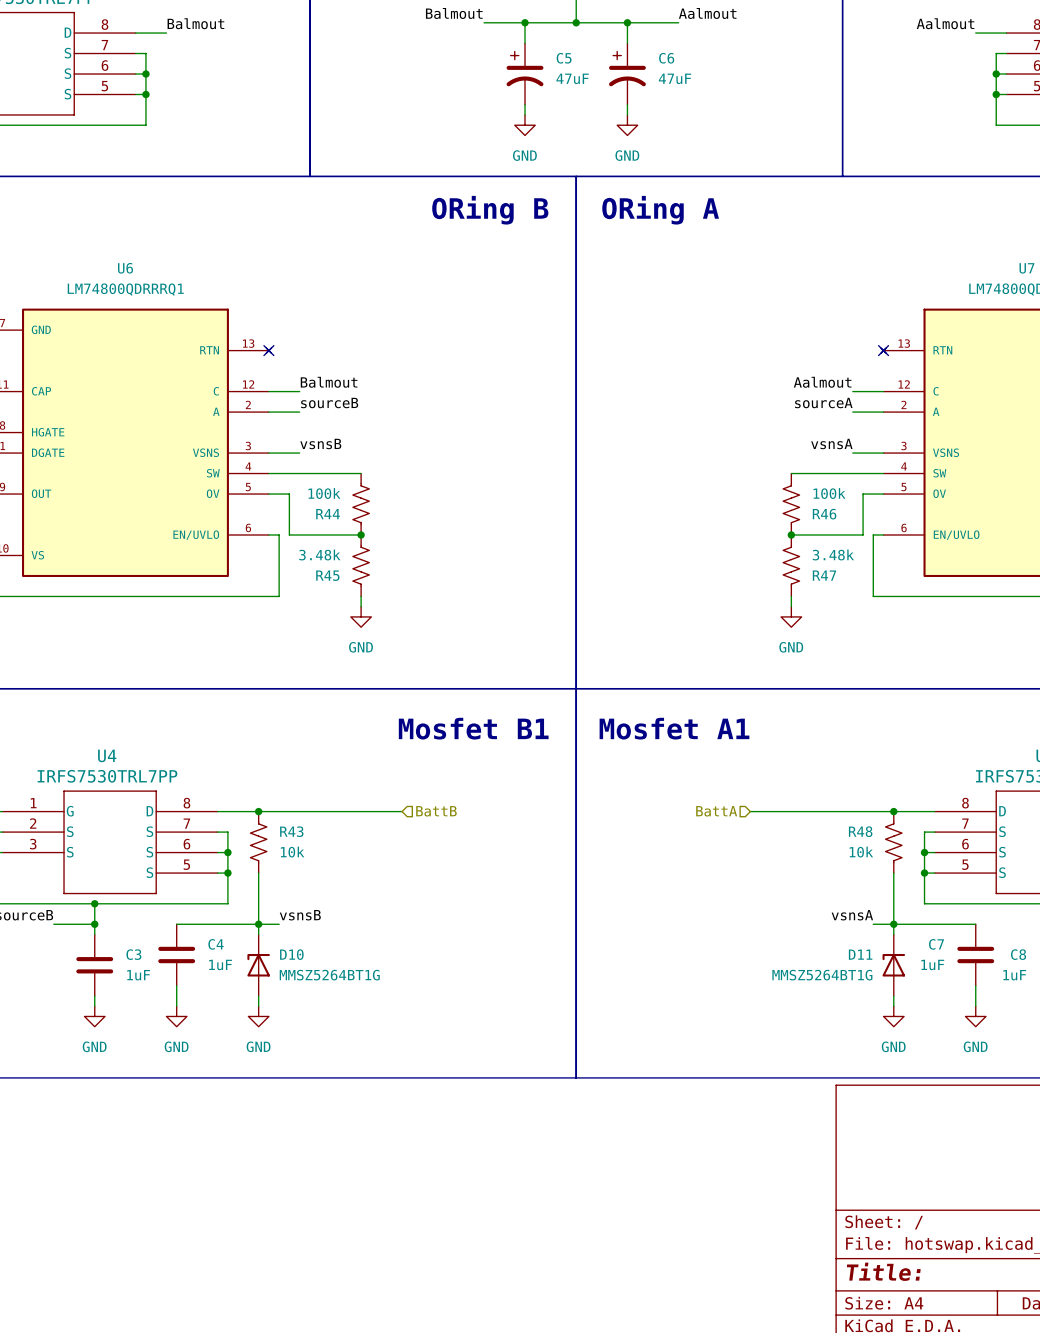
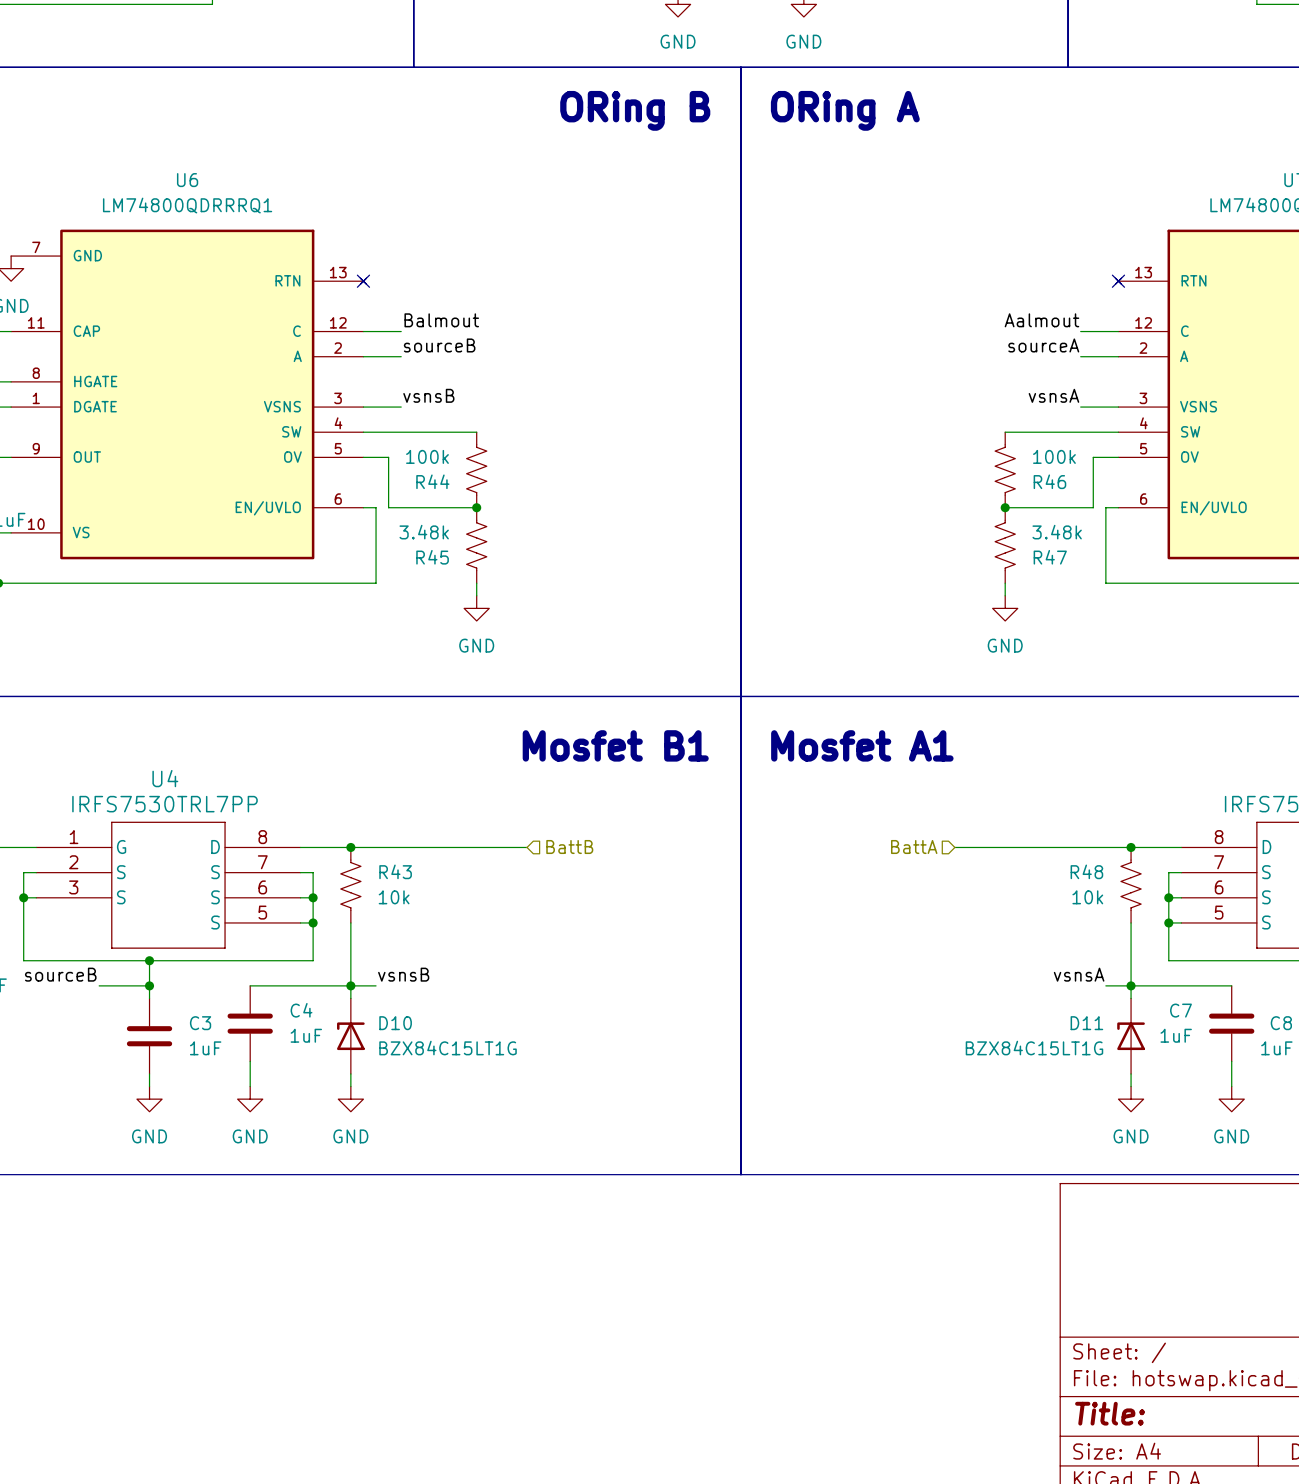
D10 value: MMSZ5264BT1G (329, 975) -> BZX84C15LT1G (448, 1048)
D11 value: MMSZ5264BT1G (822, 975) -> BZX84C15LT1G (1034, 1048)

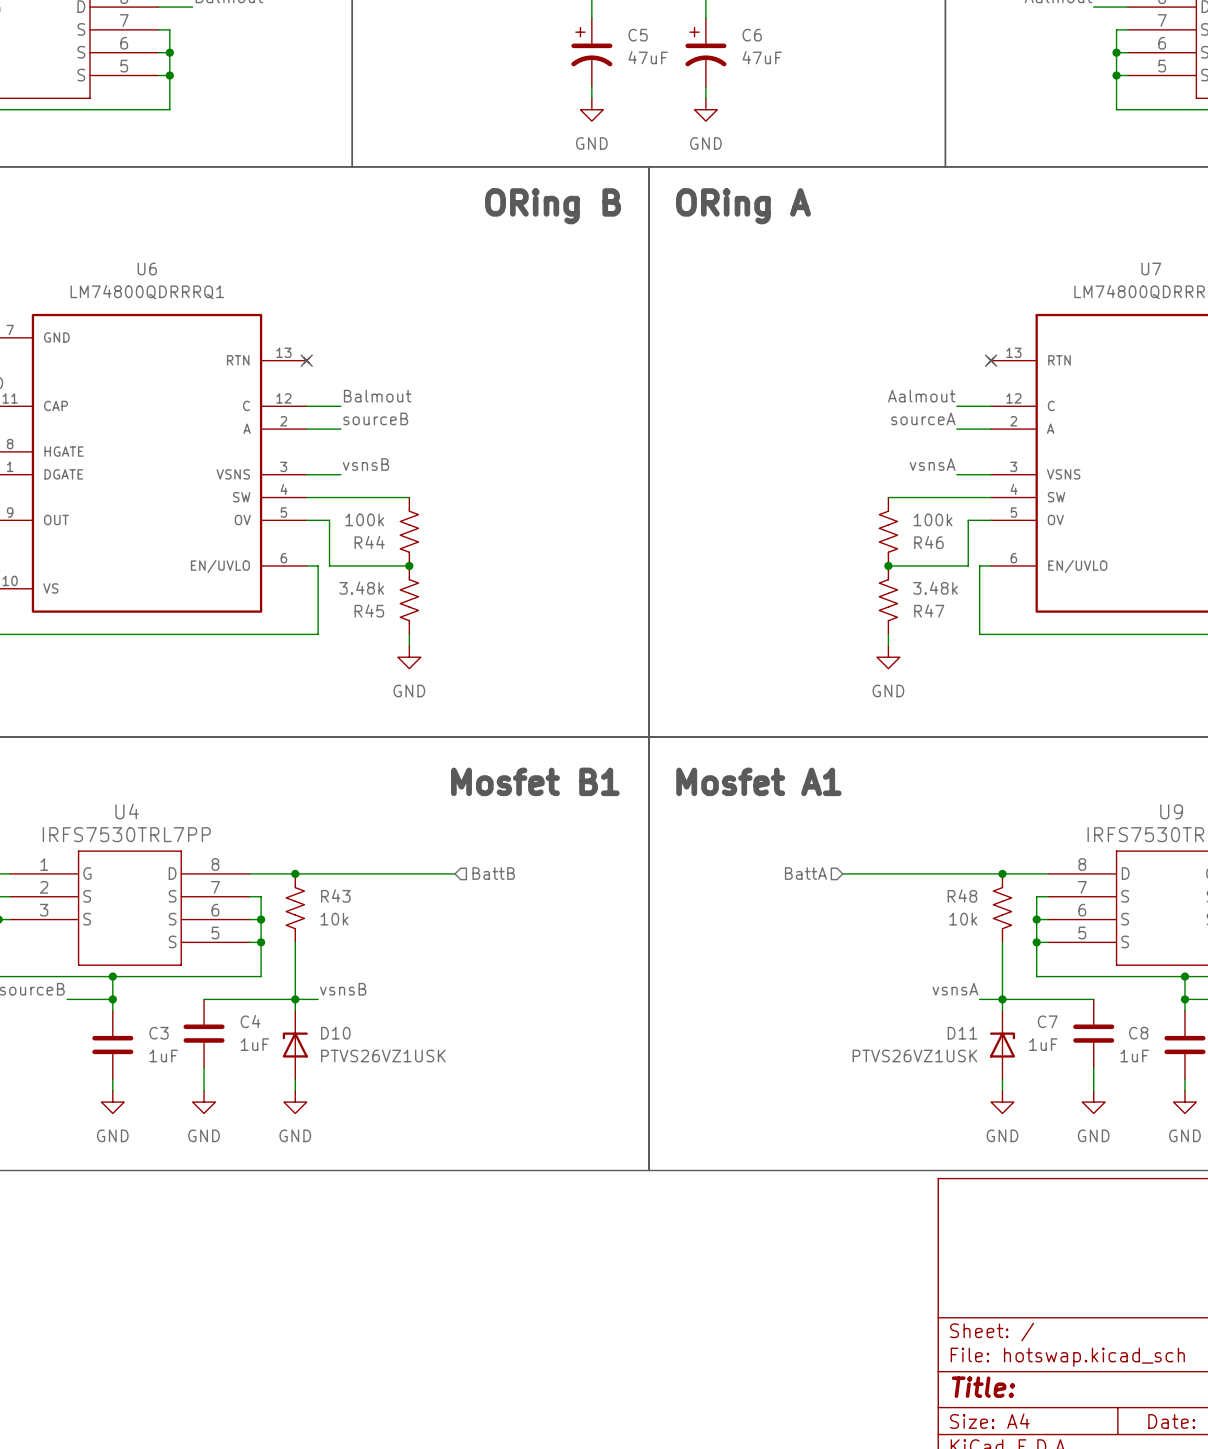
D11 flip: as is (1131, 1036) -> left-right (1002, 1045)
D10 value: BZX84C15LT1G (448, 1048) -> PTVS26VZ1USK (383, 1056)
D11 value: BZX84C15LT1G (1034, 1048) -> PTVS26VZ1USK (914, 1056)

